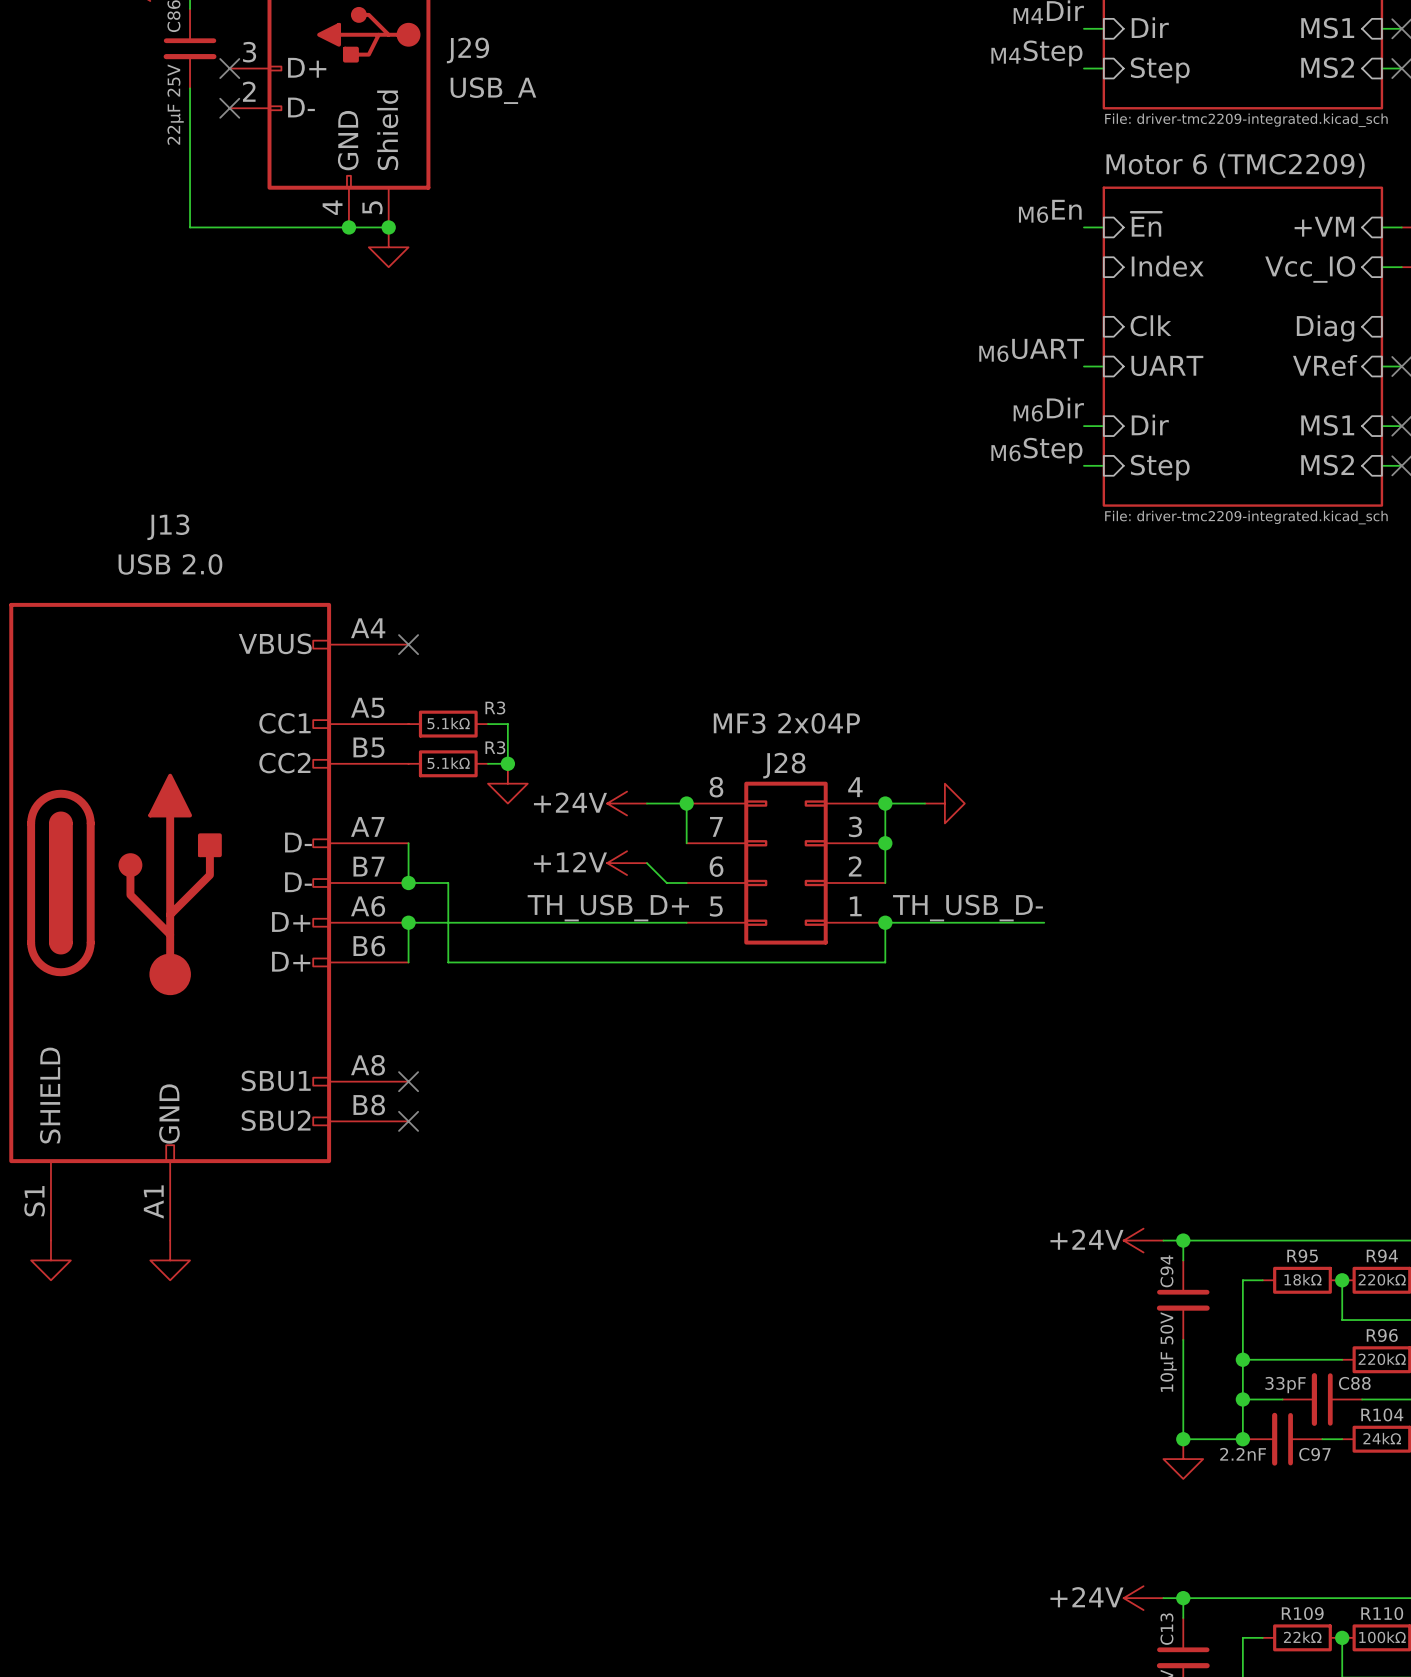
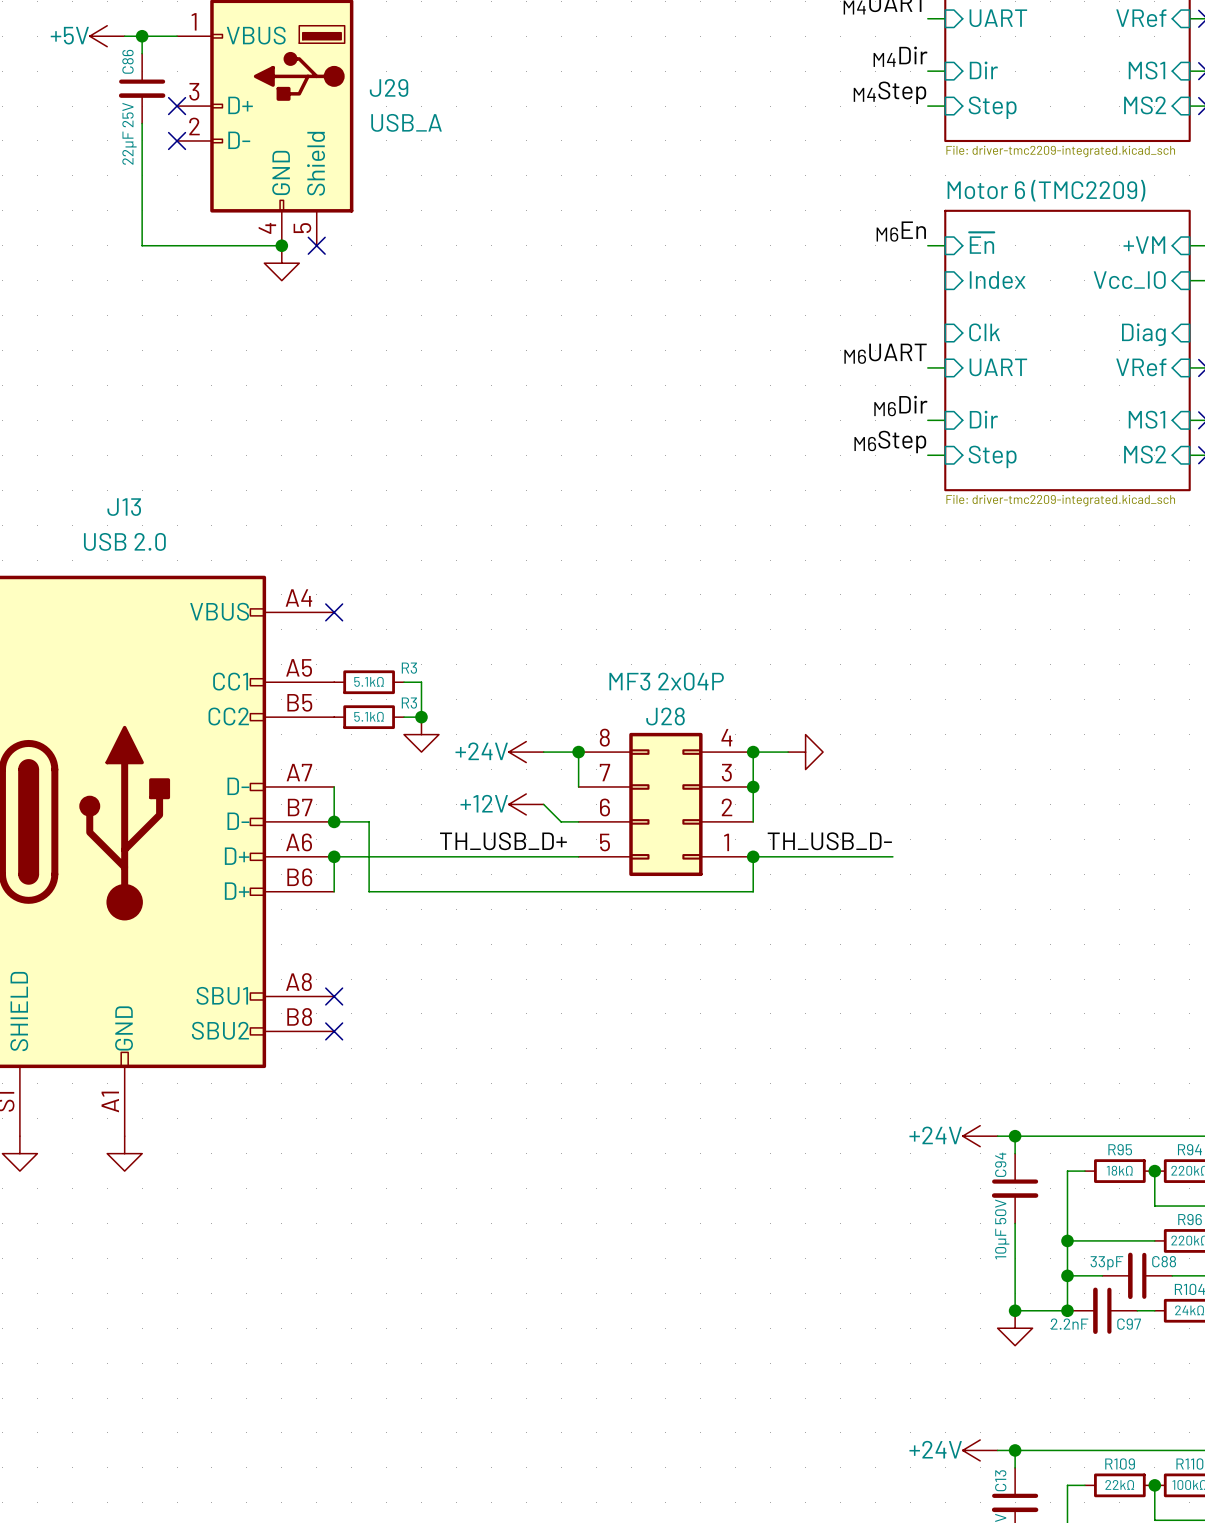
wire: (348, 227) (388, 227) -> none
junction: (388, 227) -> none
no-connect mark: none -> (316, 245)
power symbol position: (388, 247) -> (281, 263)

